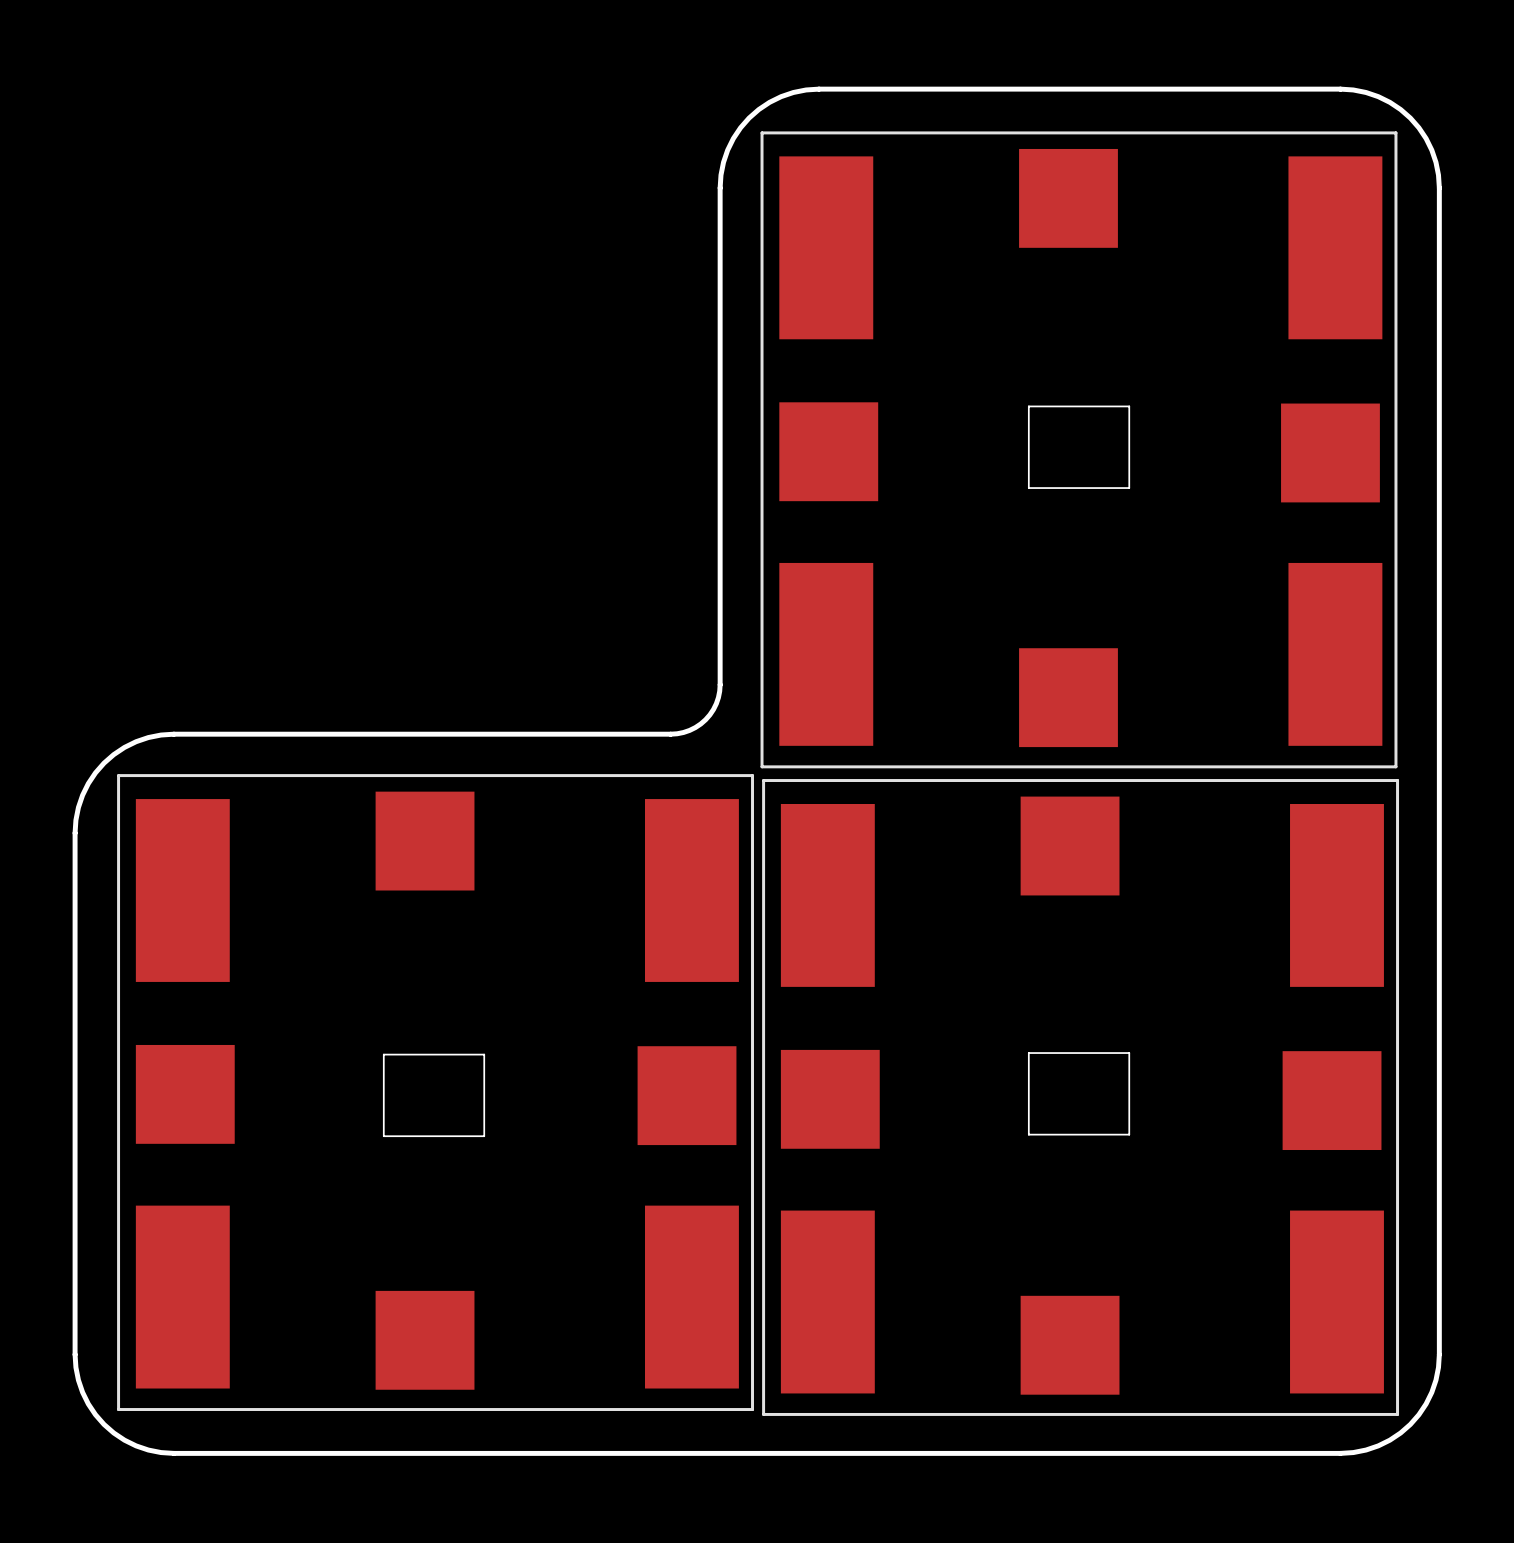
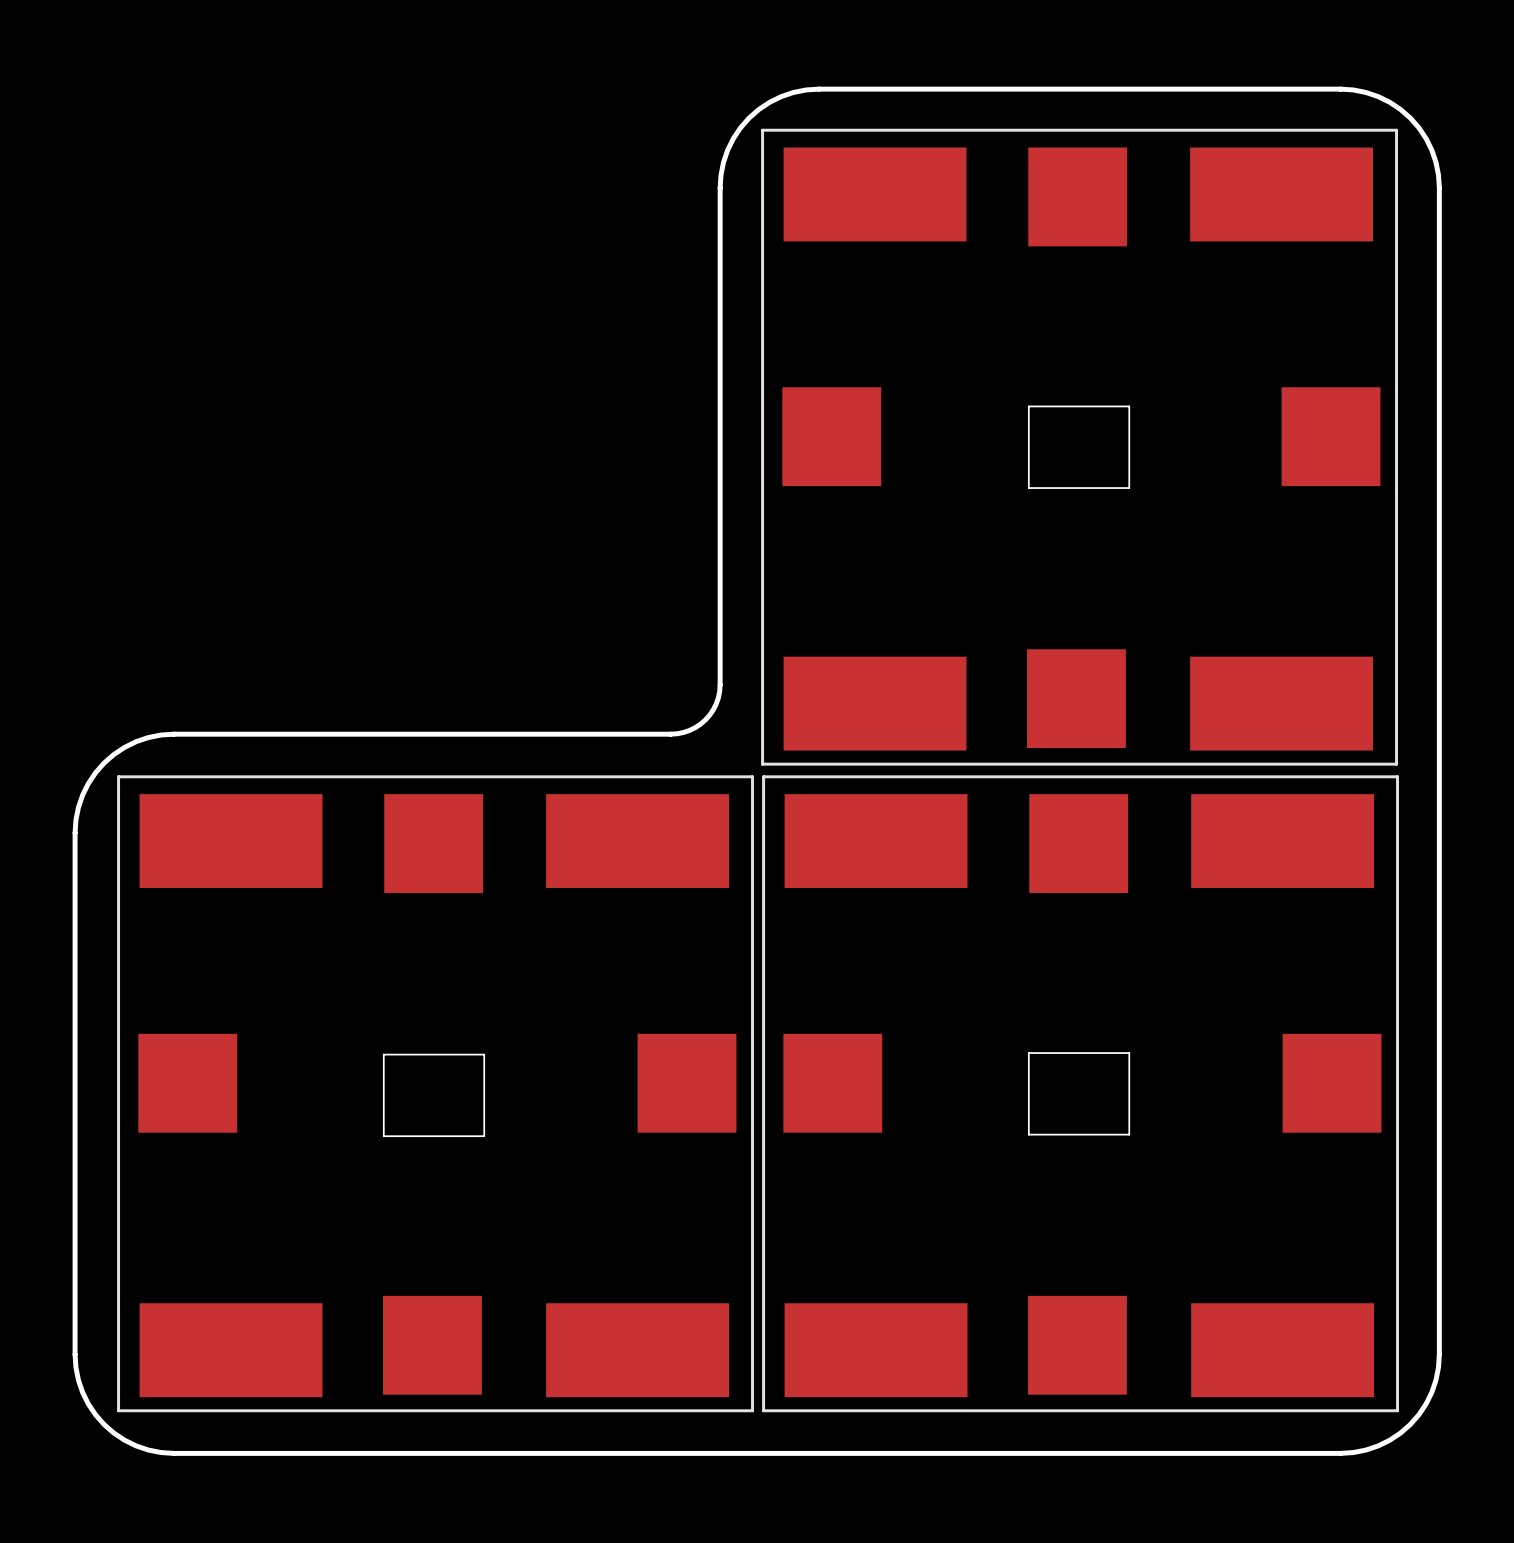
part rotation: 0° (1078, 449) -> 90° clockwise (1079, 447)
part rotation: 0° (435, 1092) -> 90° clockwise (435, 1093)
part rotation: 0° (1080, 1097) -> 90° clockwise (1080, 1093)

